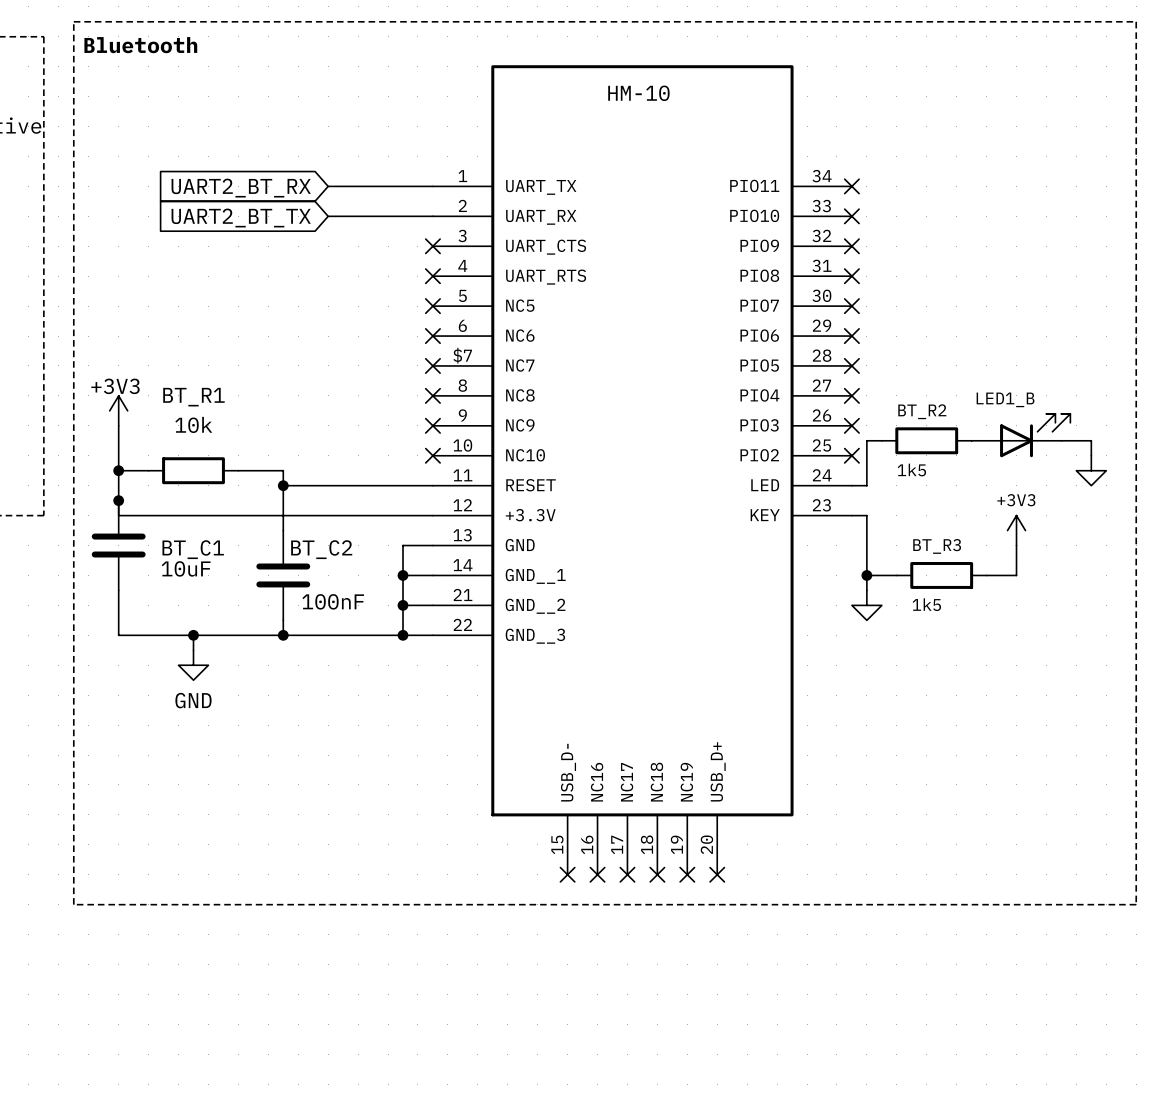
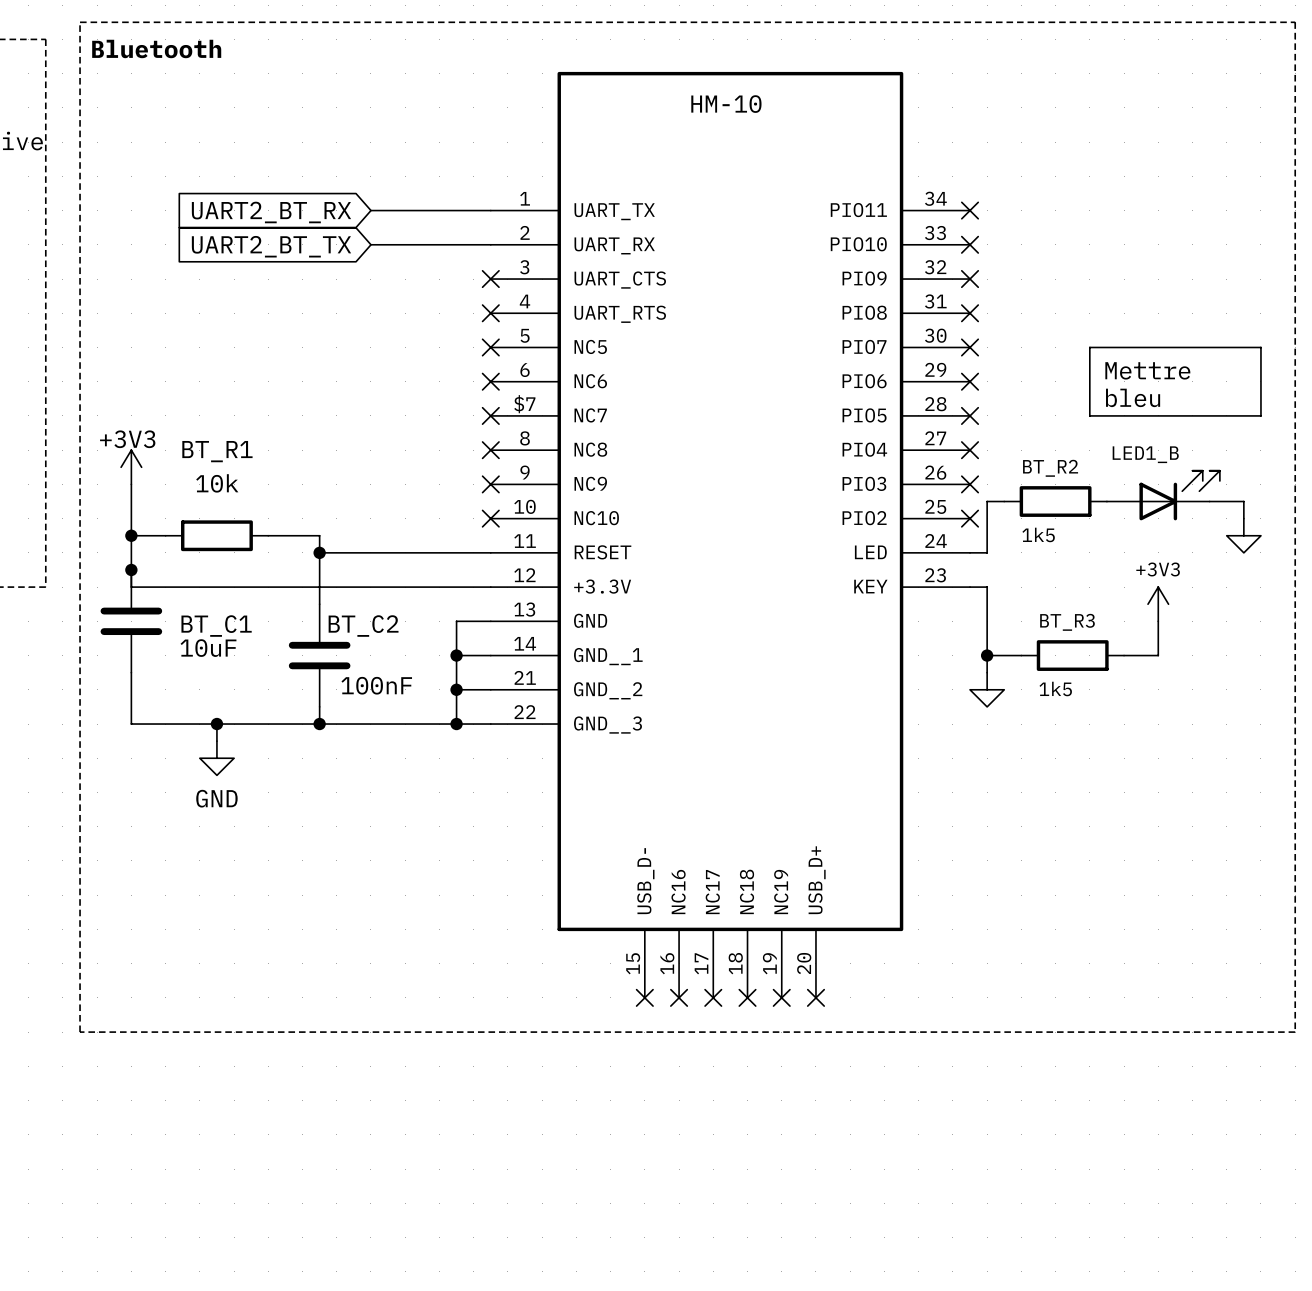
line: none -> (1089, 347) (1260, 347) (1260, 415) (1089, 415) (1089, 347)
text: none -> Mettre (1147, 370)
text: none -> bleu (1133, 397)

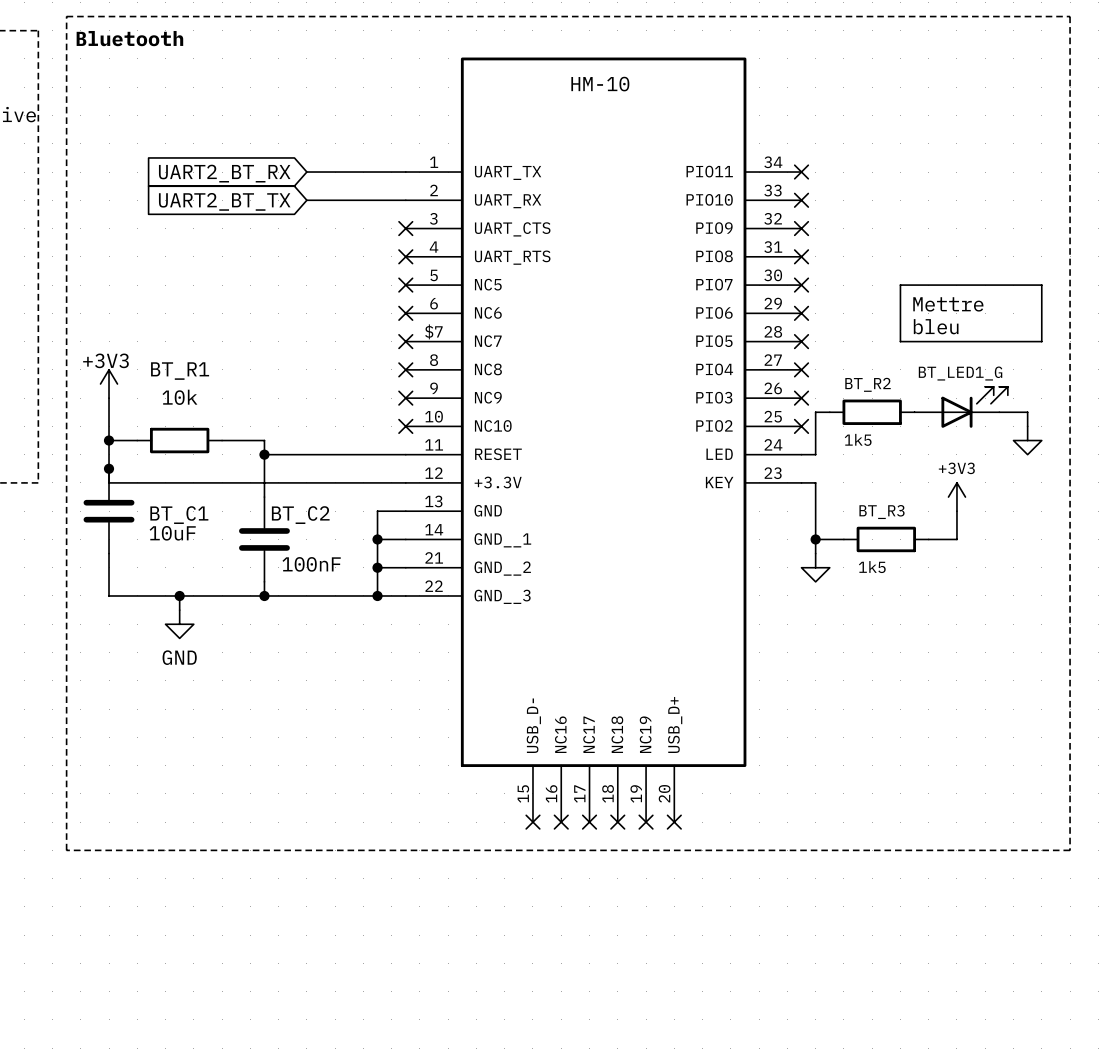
part value: LED1_B (1145, 454) -> BT_LED1_G (960, 373)

